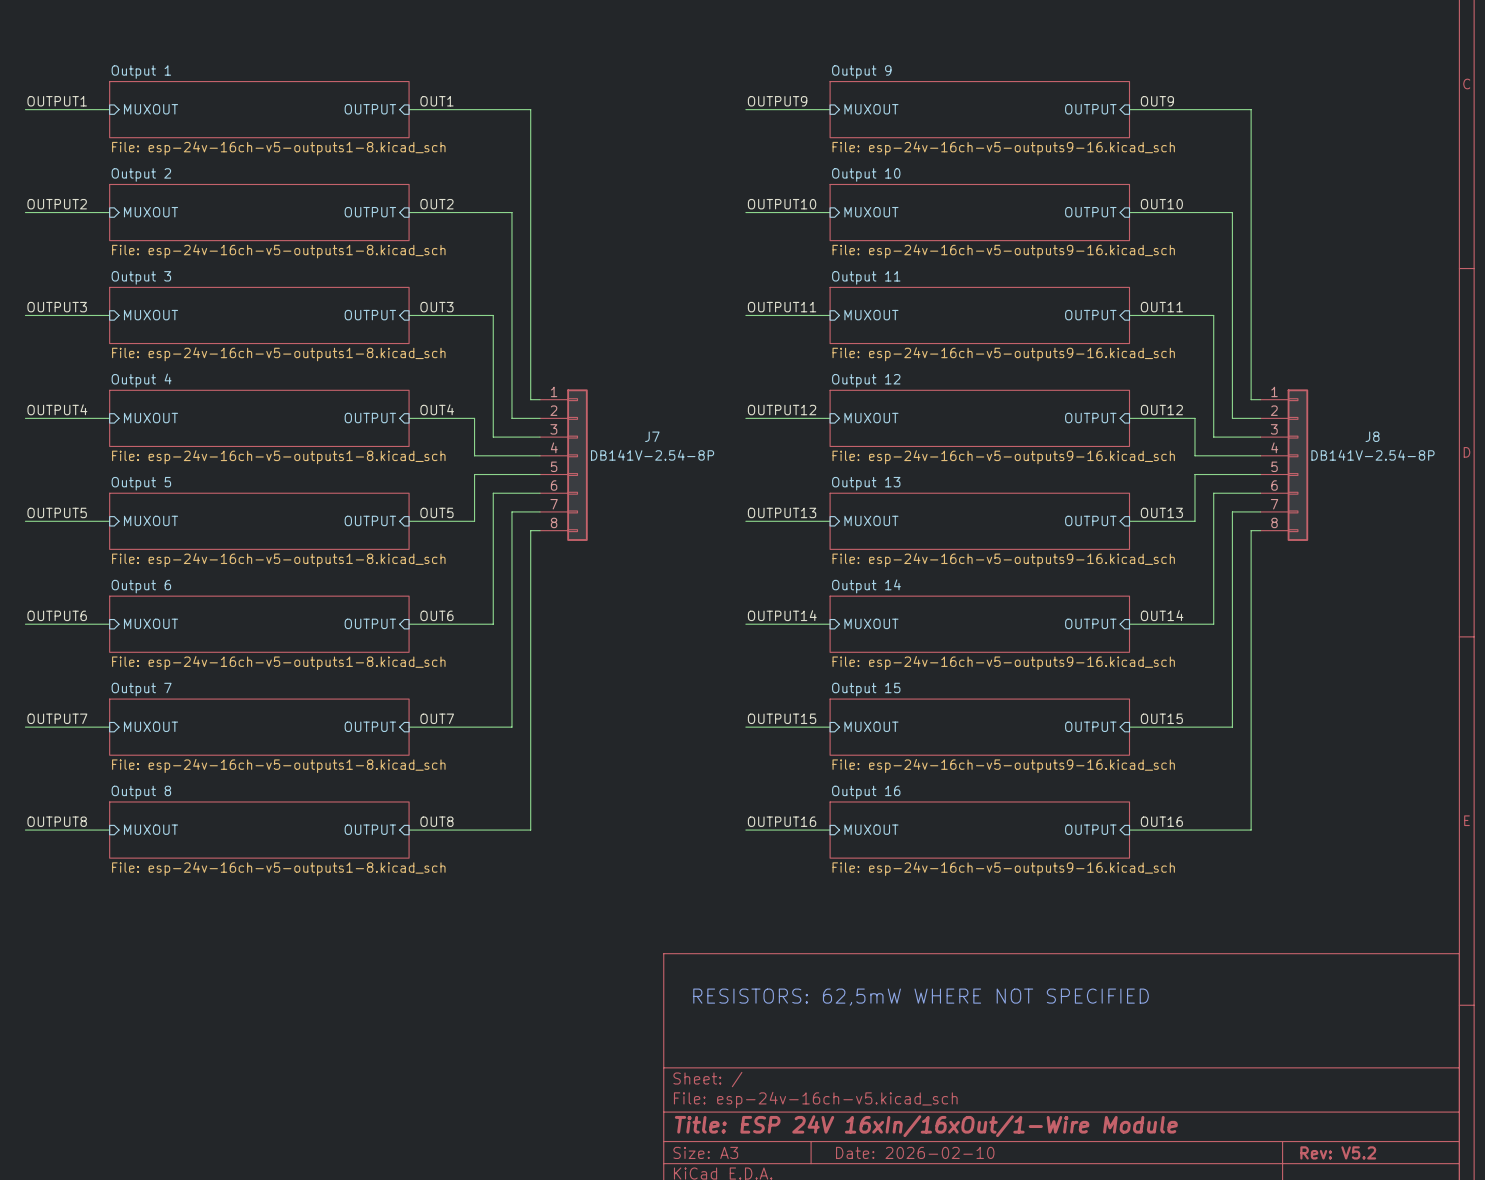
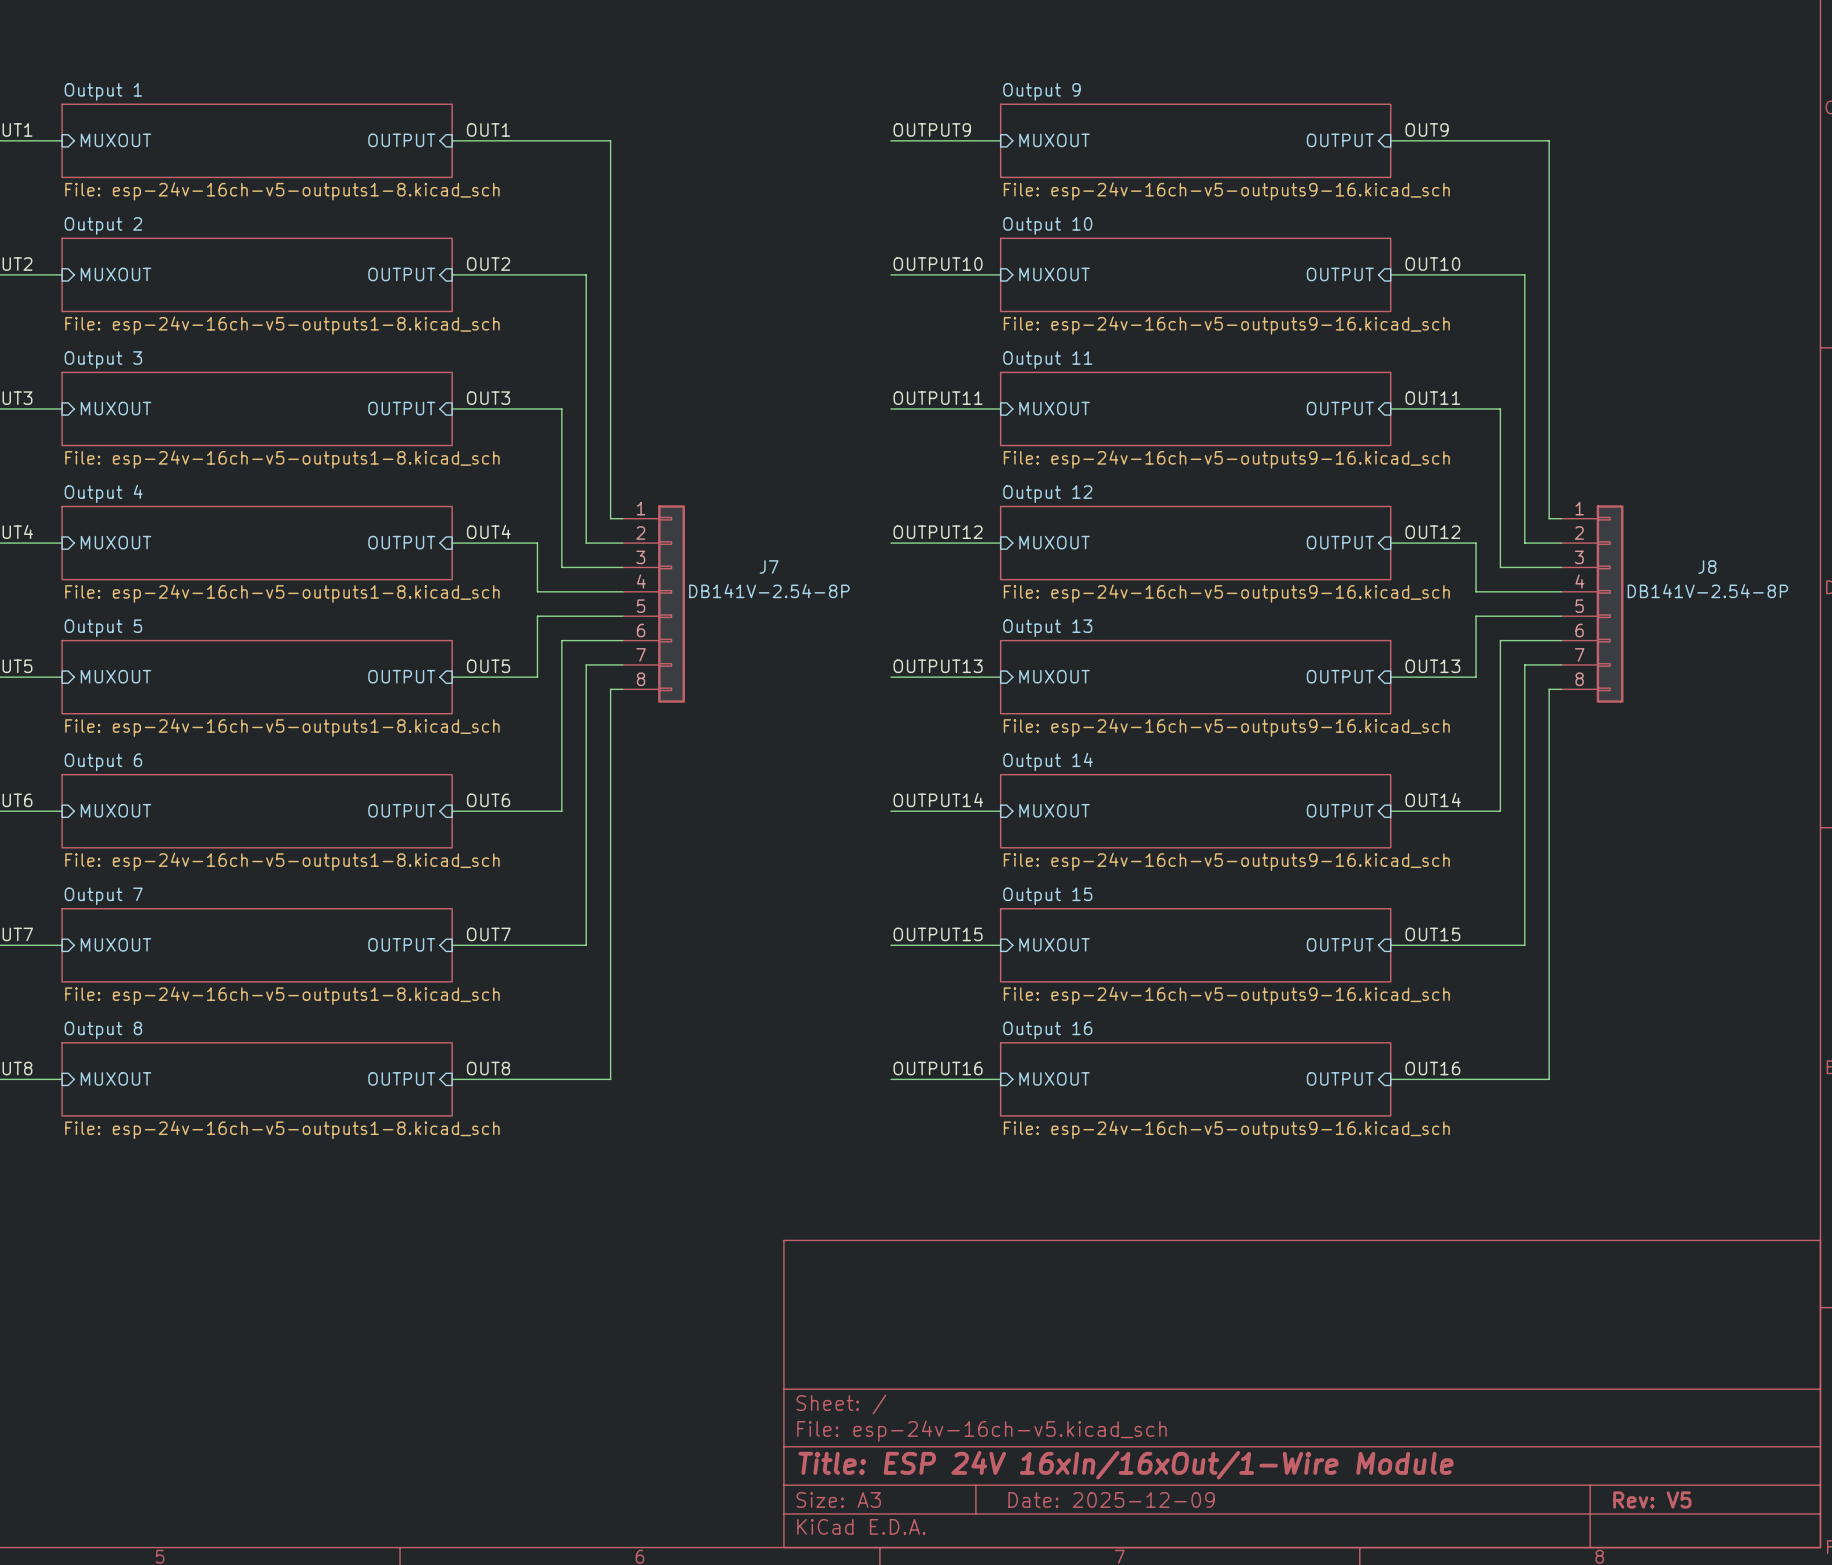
text: RESISTORS: 62,5mW WHERE NOT SPECIFIED (921, 997) -> none
title block: Date: 2026-02-10 (915, 1152) -> Date: 2025-12-09 (1111, 1499)
title block: Rev: V5.2 (1338, 1152) -> Rev: V5 (1652, 1499)

